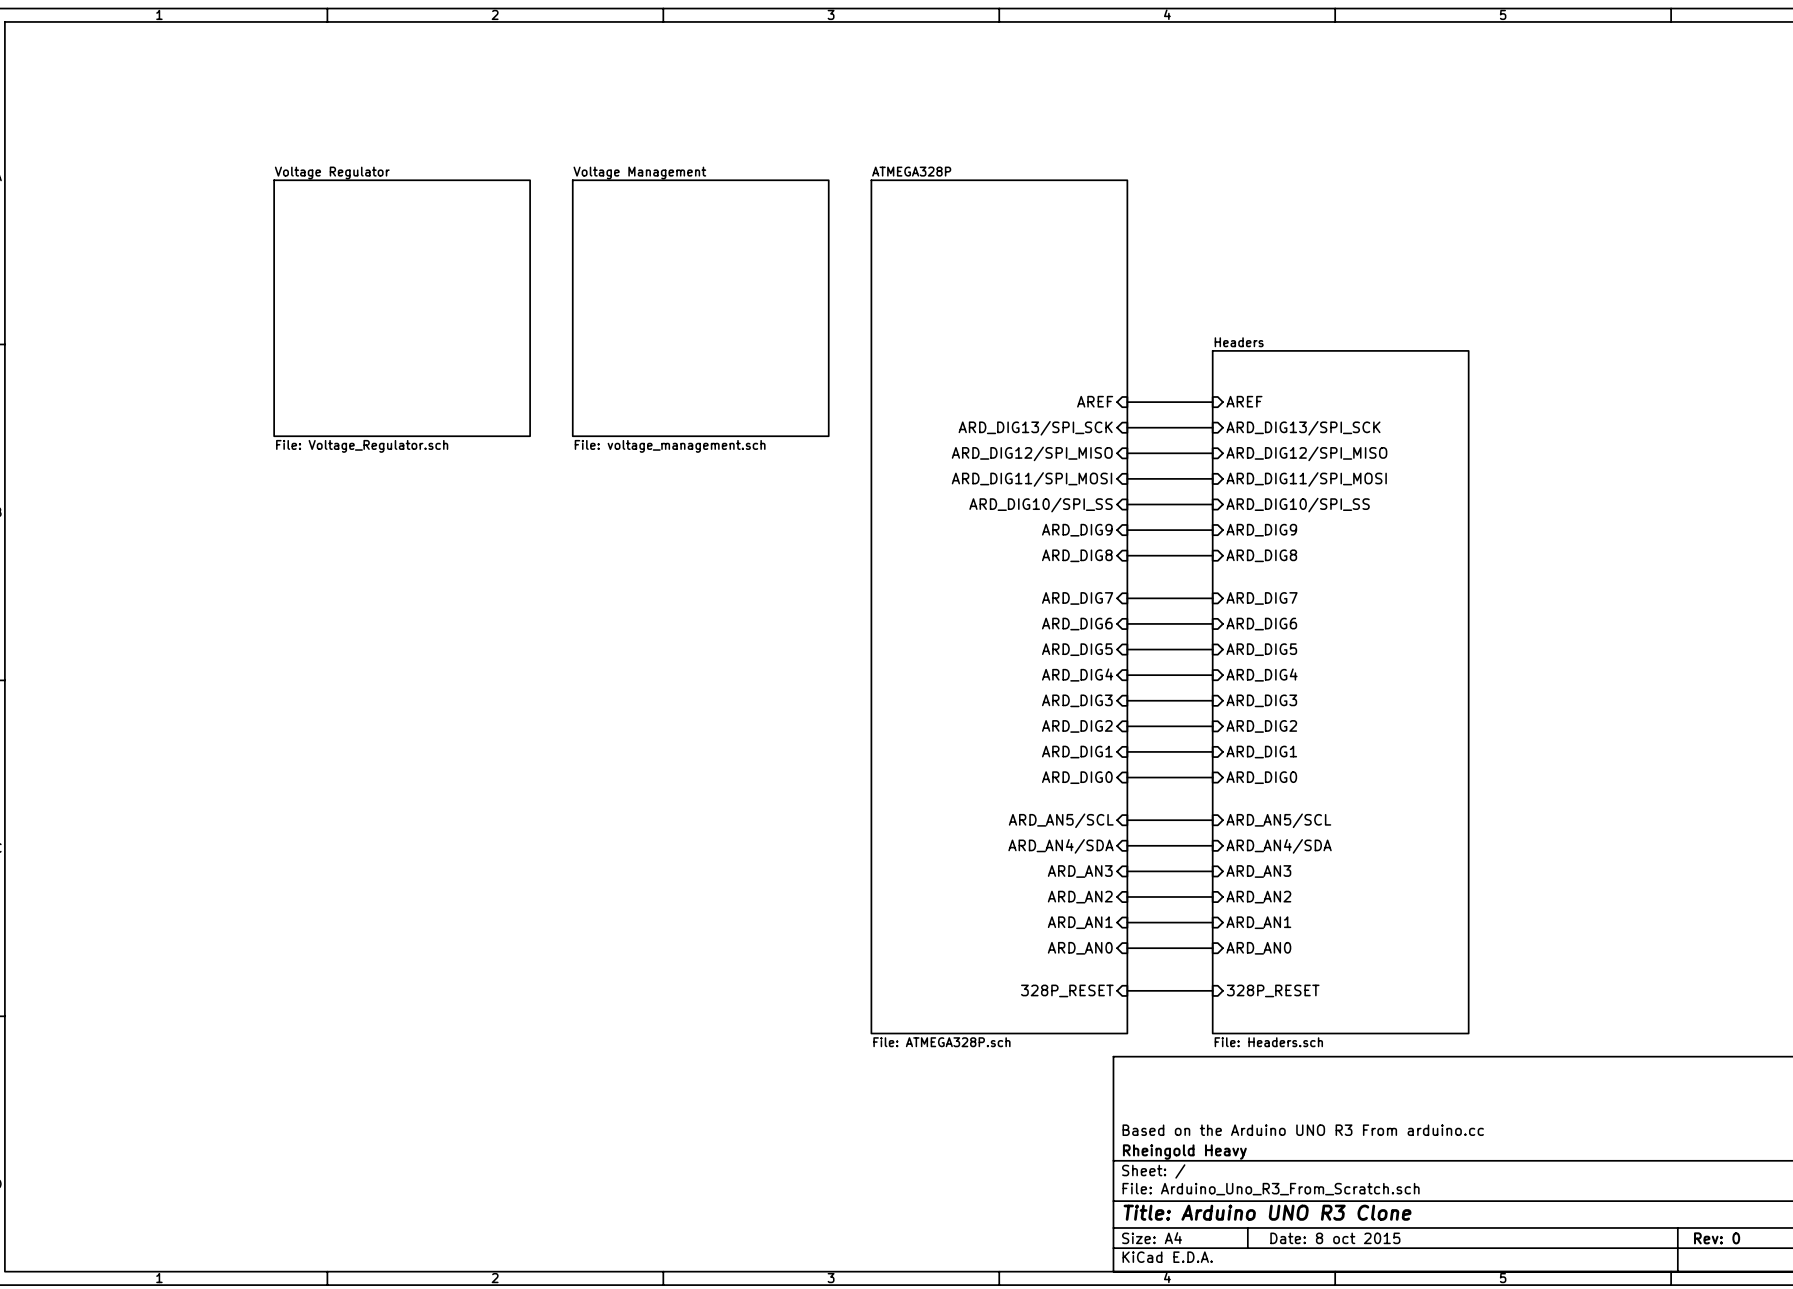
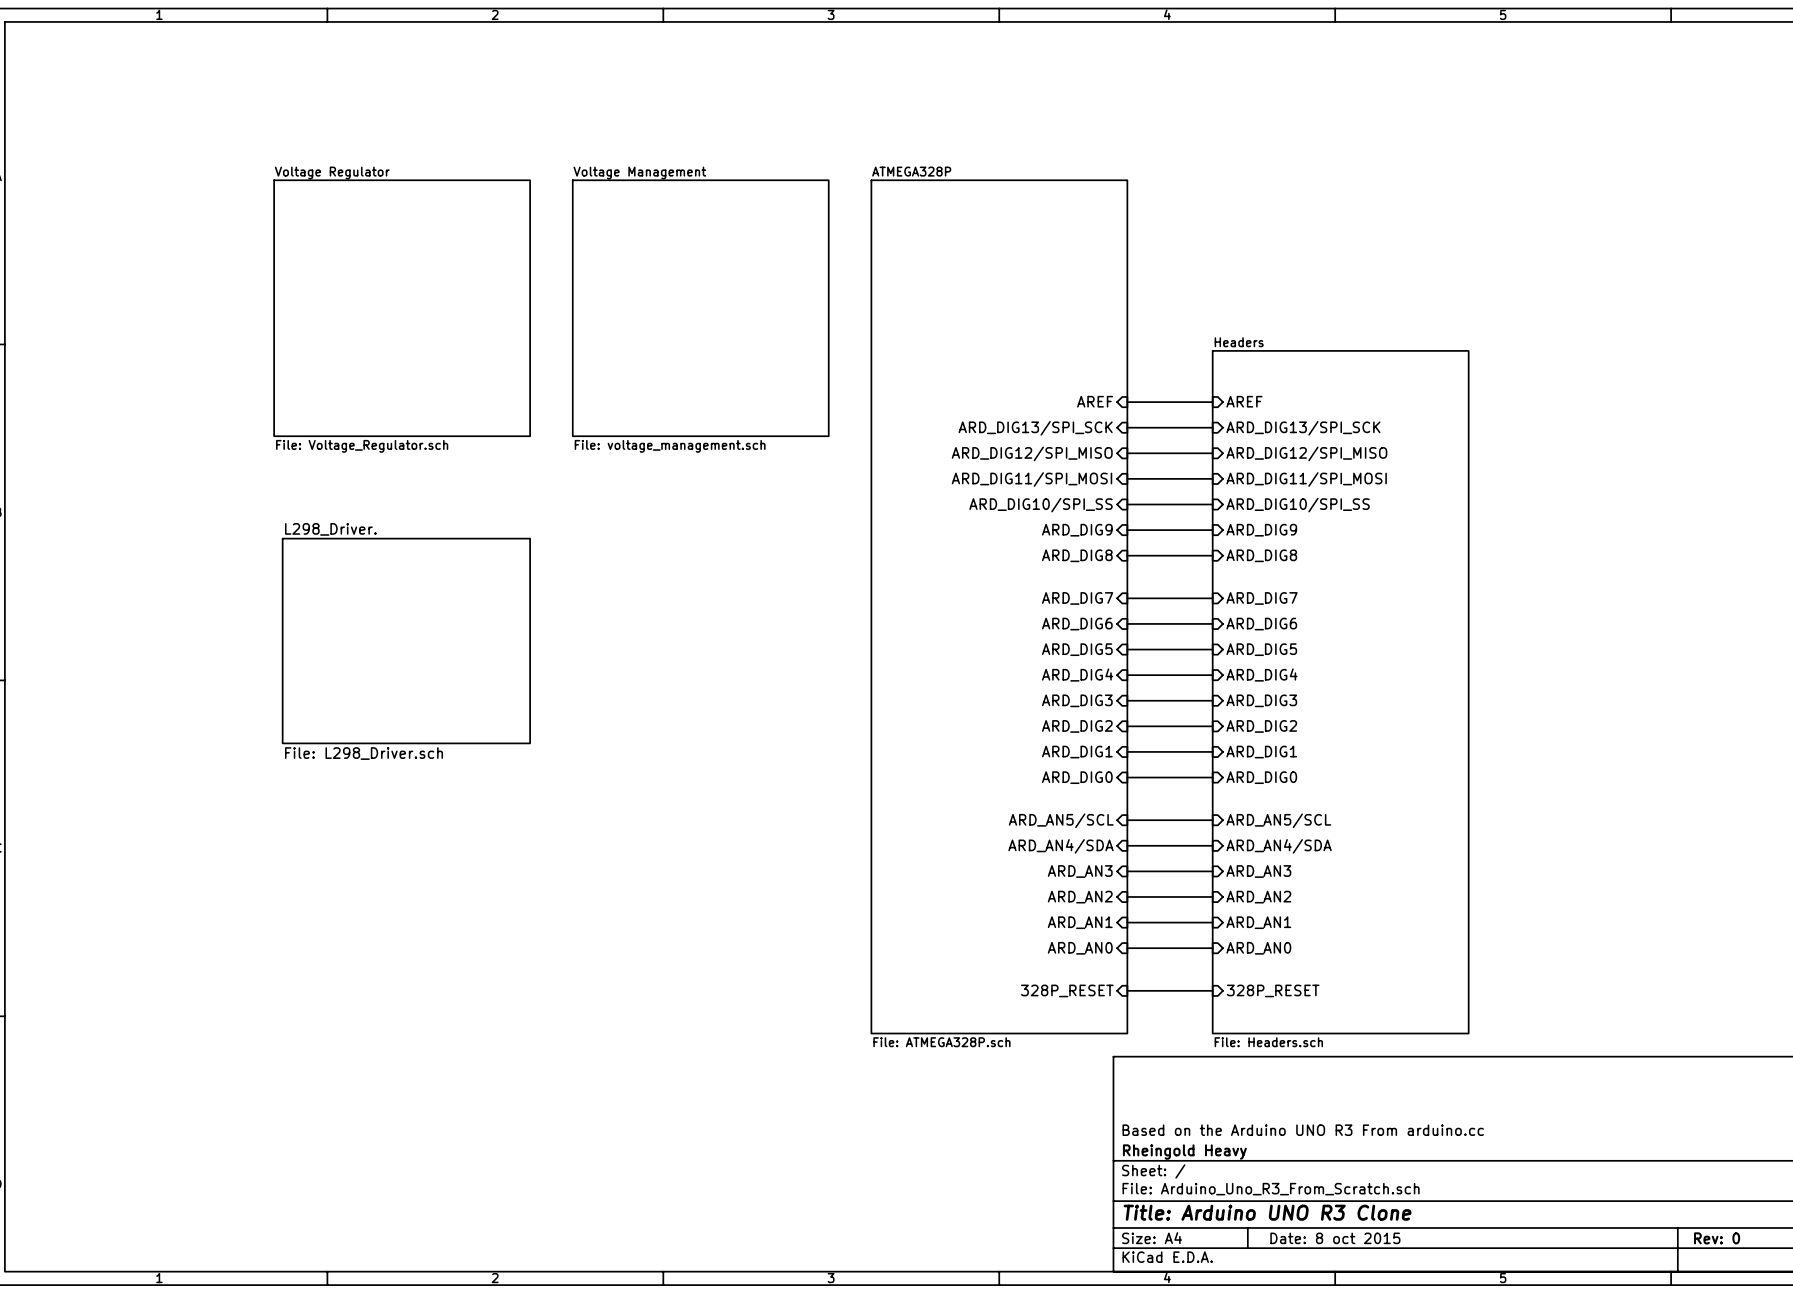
sheet L298_Driver.: none -> File: L298_Driver.sch (406, 641)

